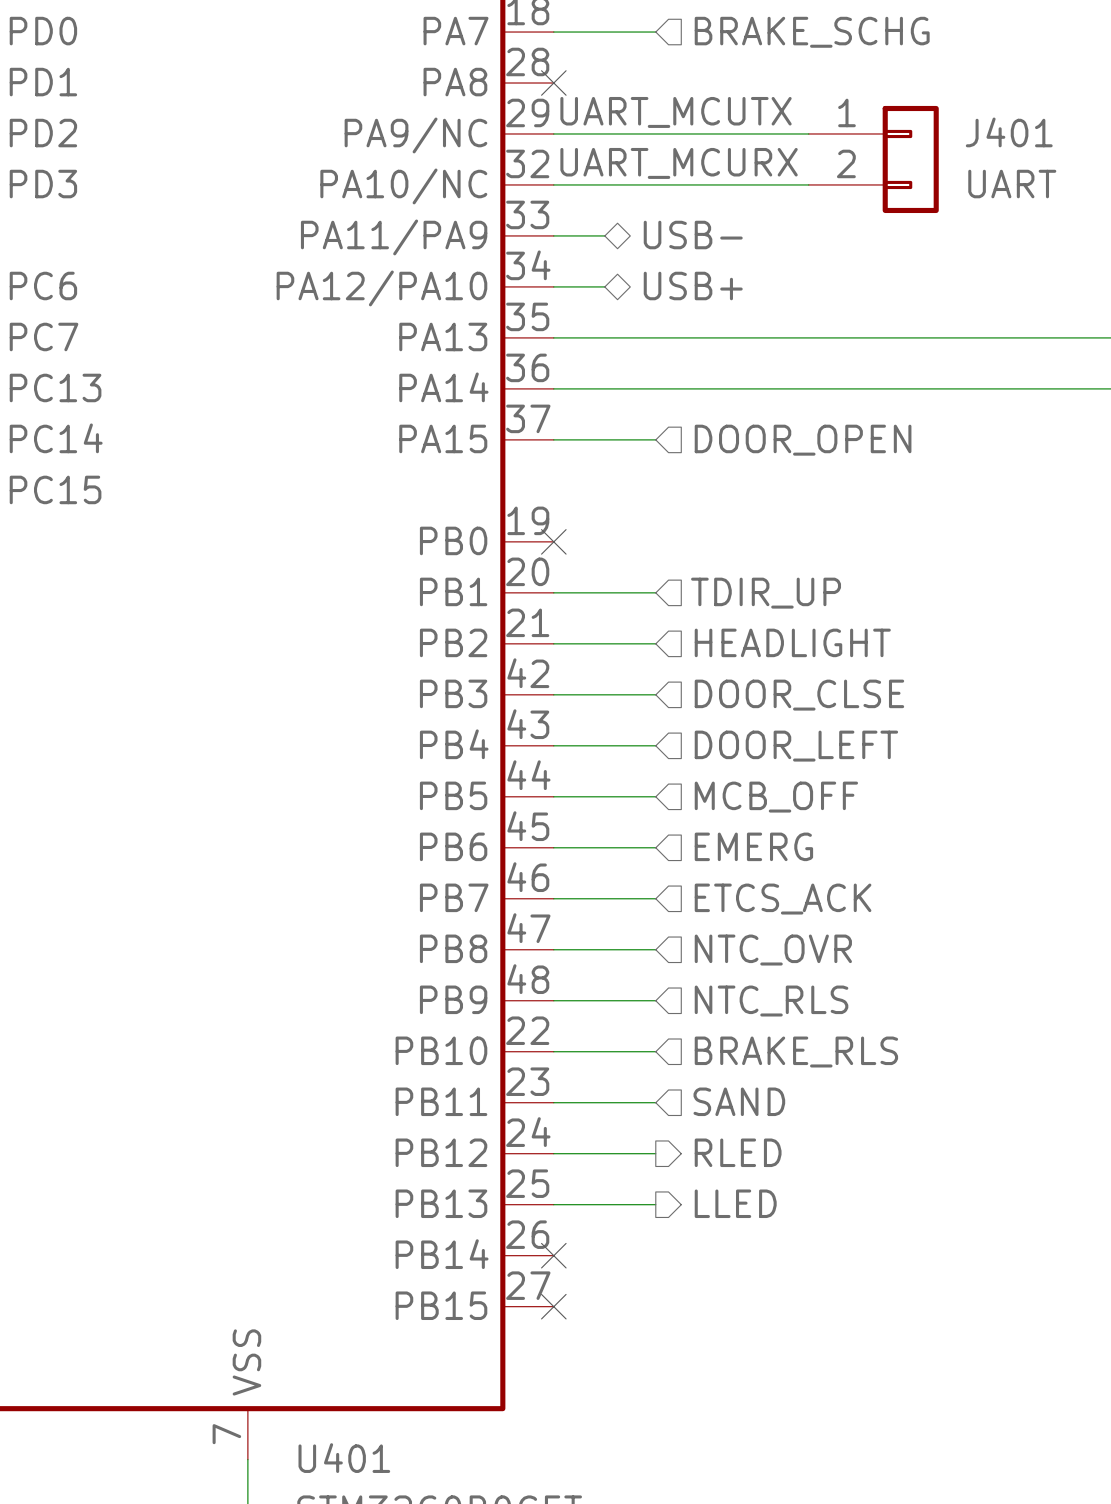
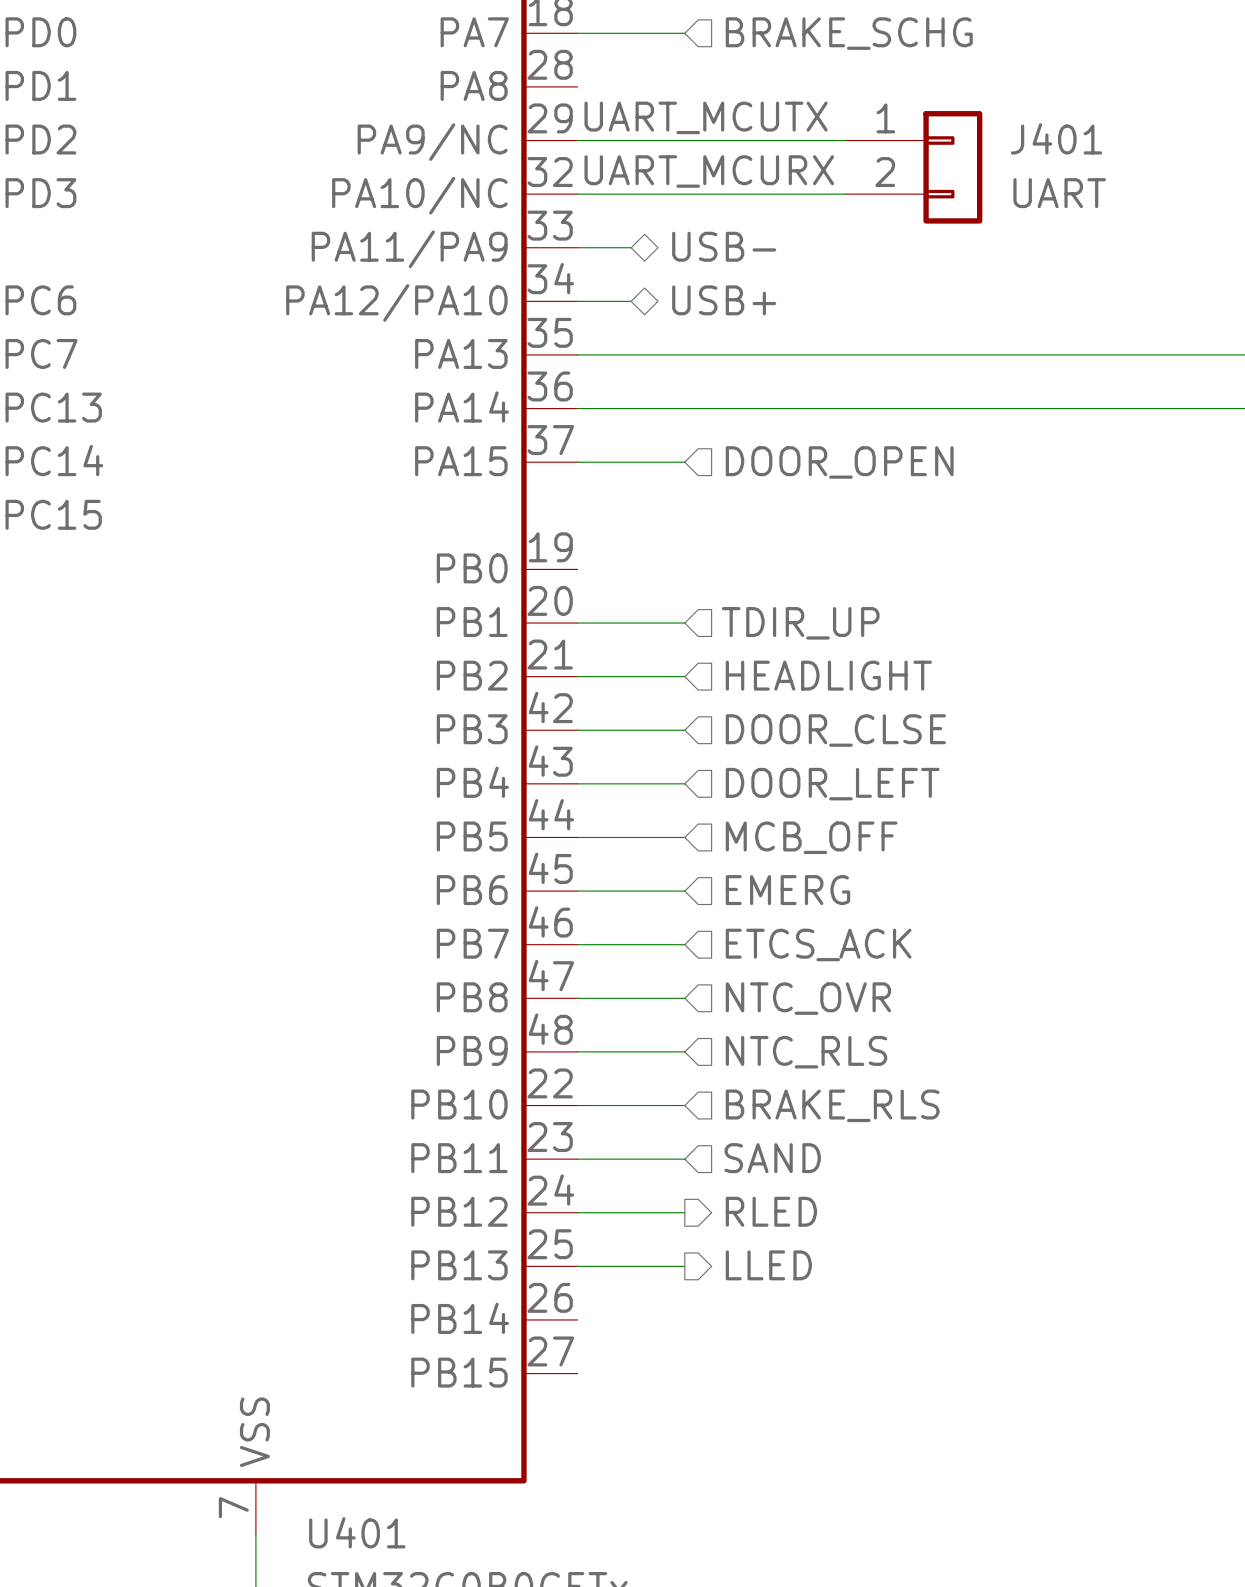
no-connect mark: (553, 83) -> none
no-connect mark: (553, 541) -> none
no-connect mark: (553, 1255) -> none
no-connect mark: (553, 1306) -> none

